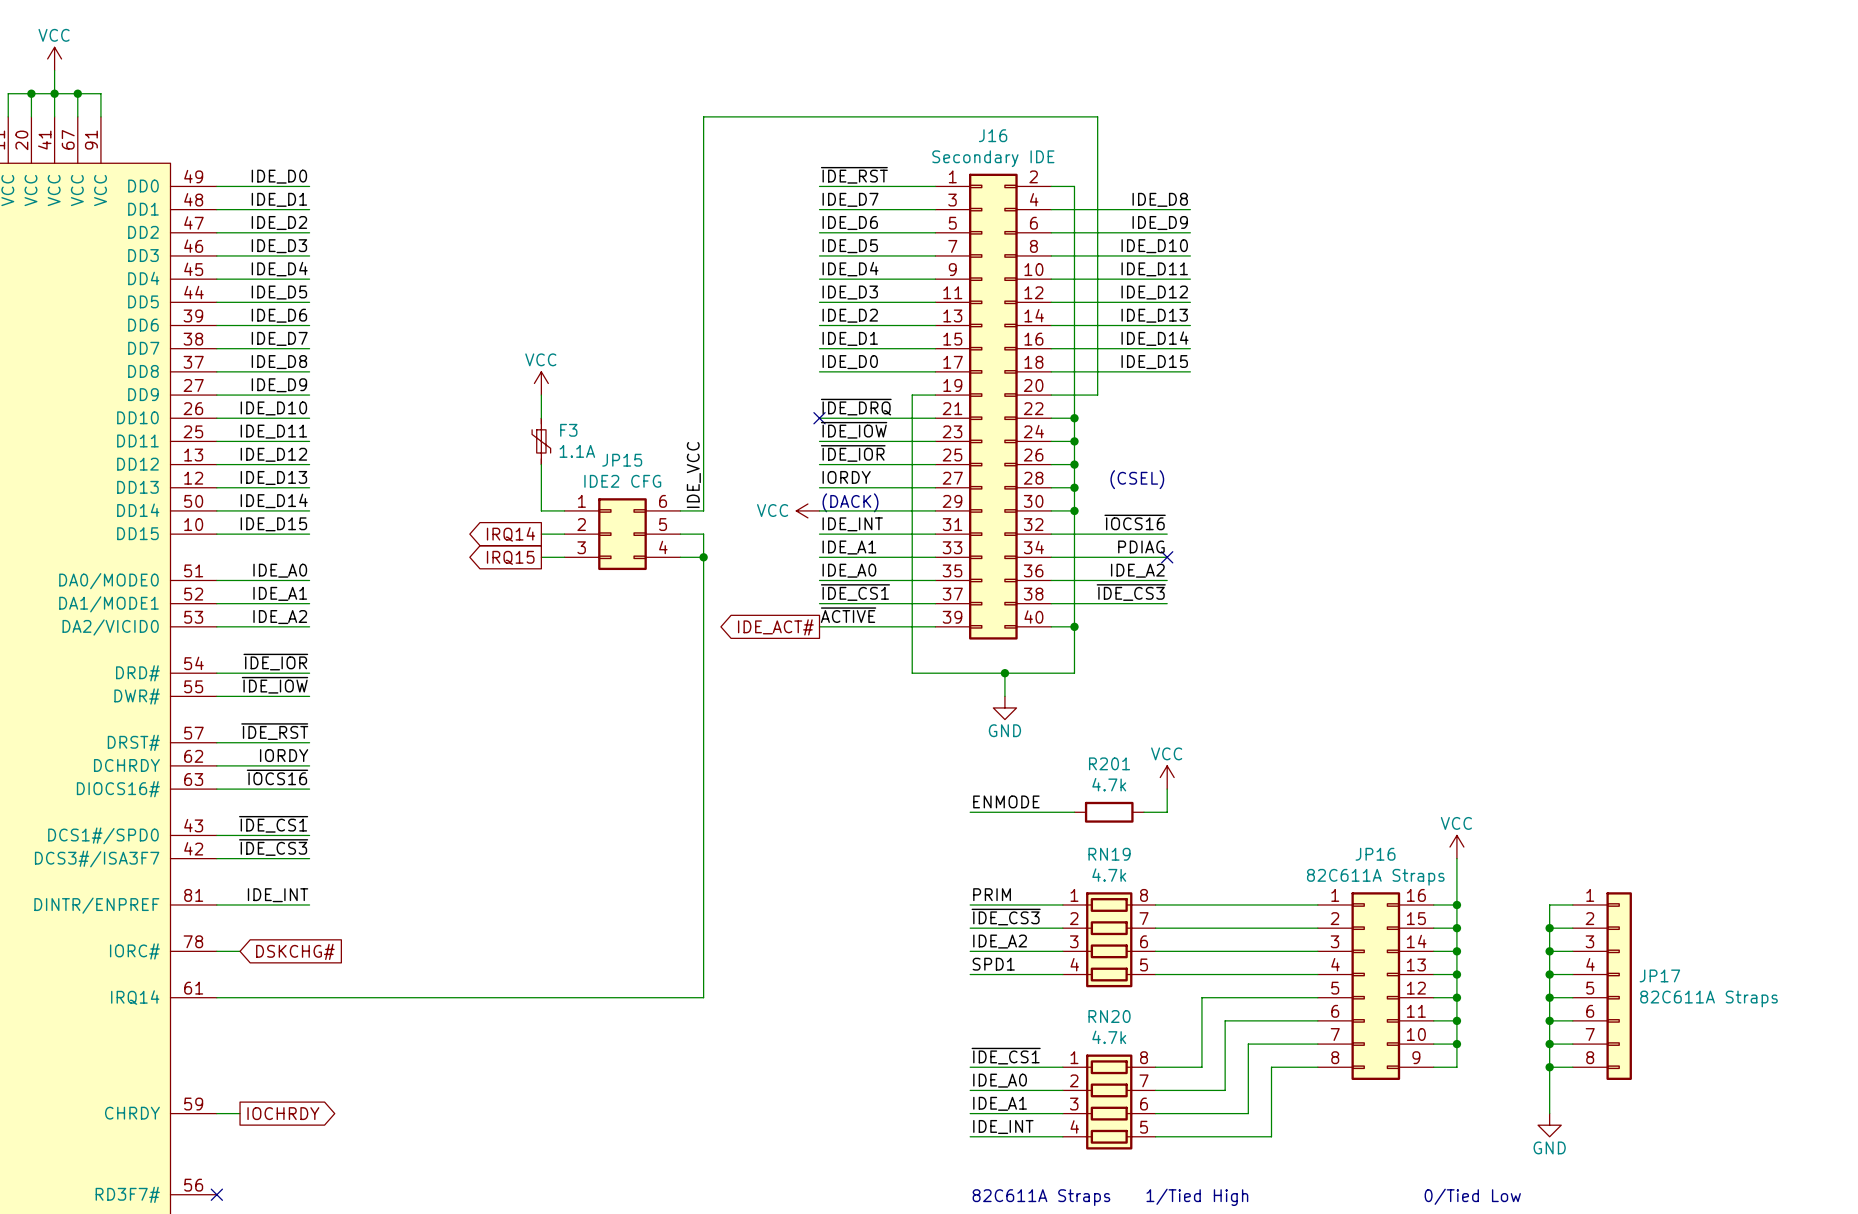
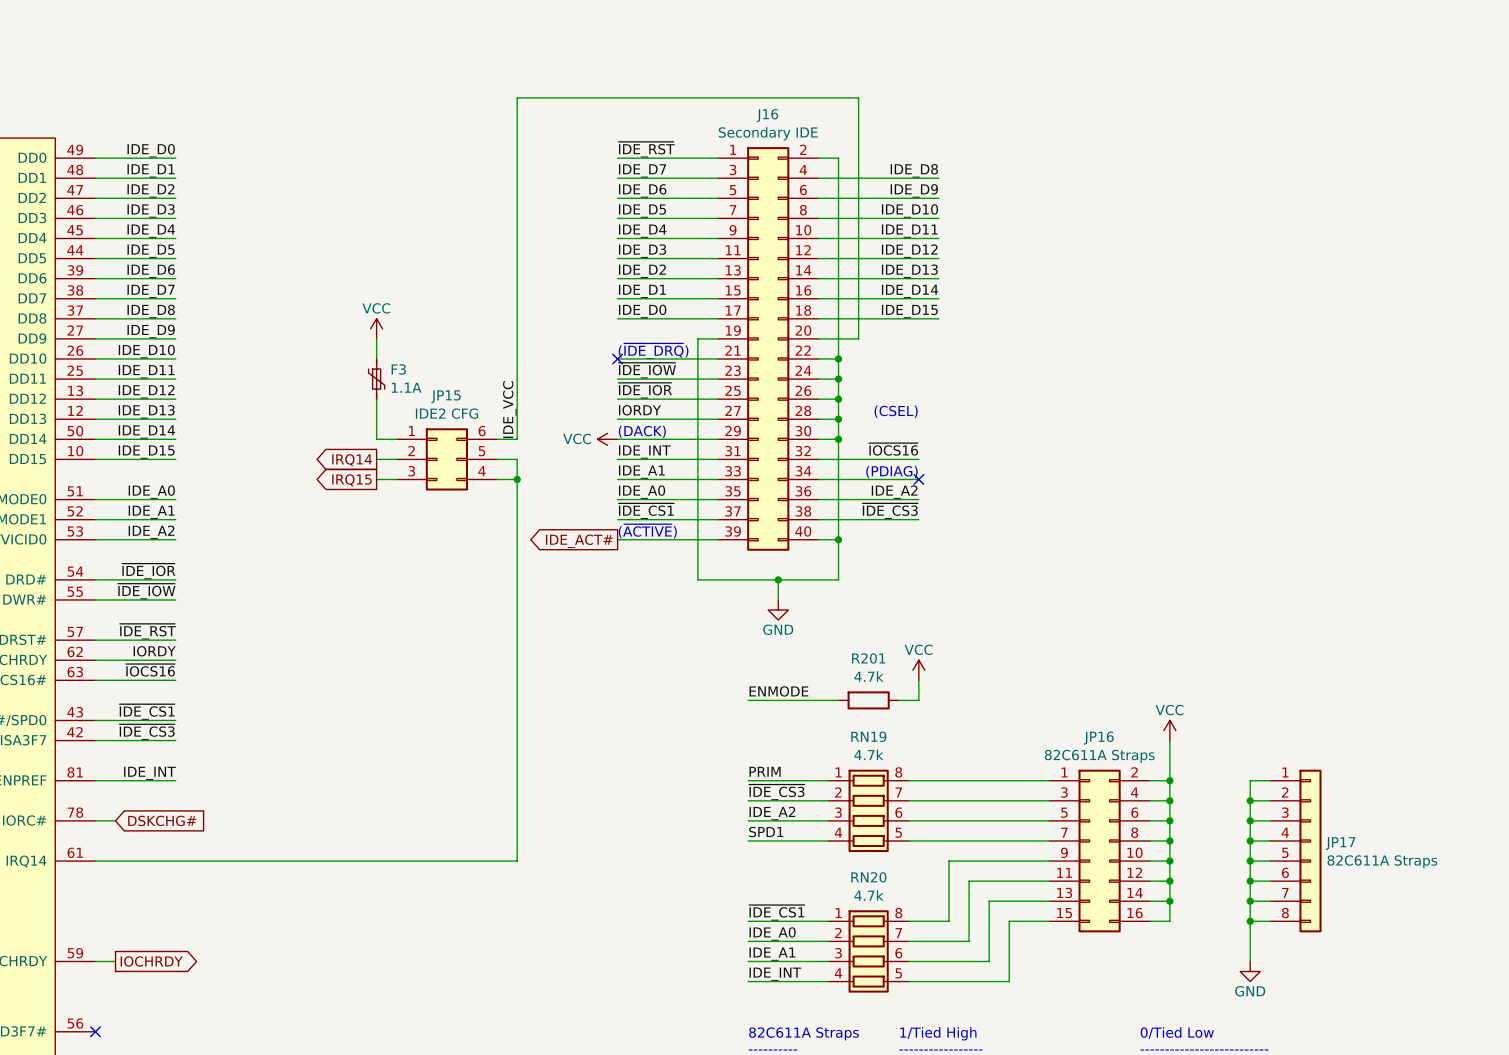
label: ~{IDE_DRQ} (856, 407) -> none
text: none -> (~{IDE_DRQ}) (653, 351)
label: PDIAG (1141, 546) -> none
text: none -> (PDIAG) (891, 471)
label: ~{ACTIVE} (848, 615) -> none
text: none -> (~{ACTIVE}) (647, 531)
JP16 symbol: [1317, 892, 1434, 1080] -> [1049, 769, 1150, 933]

